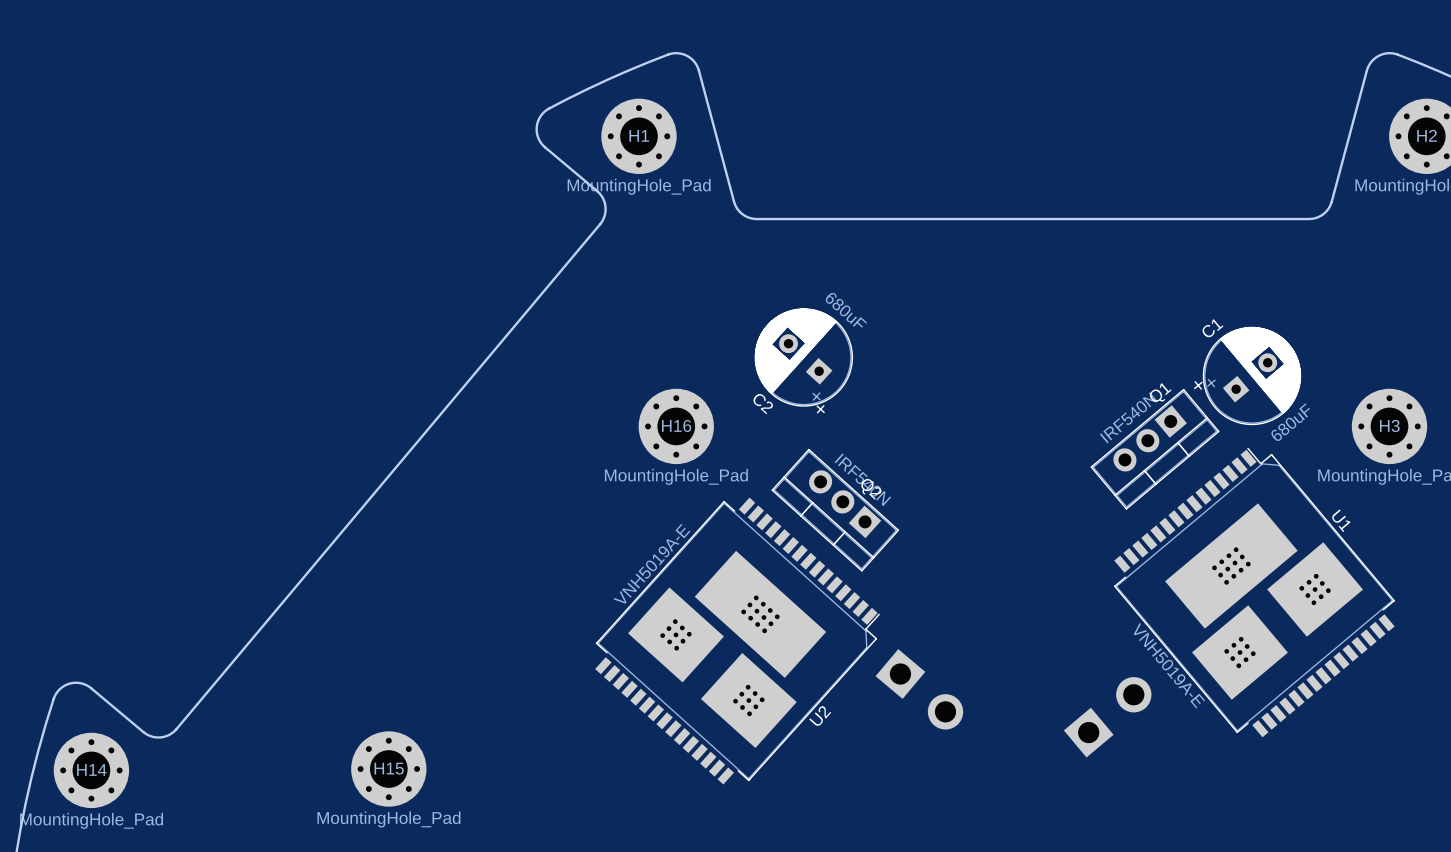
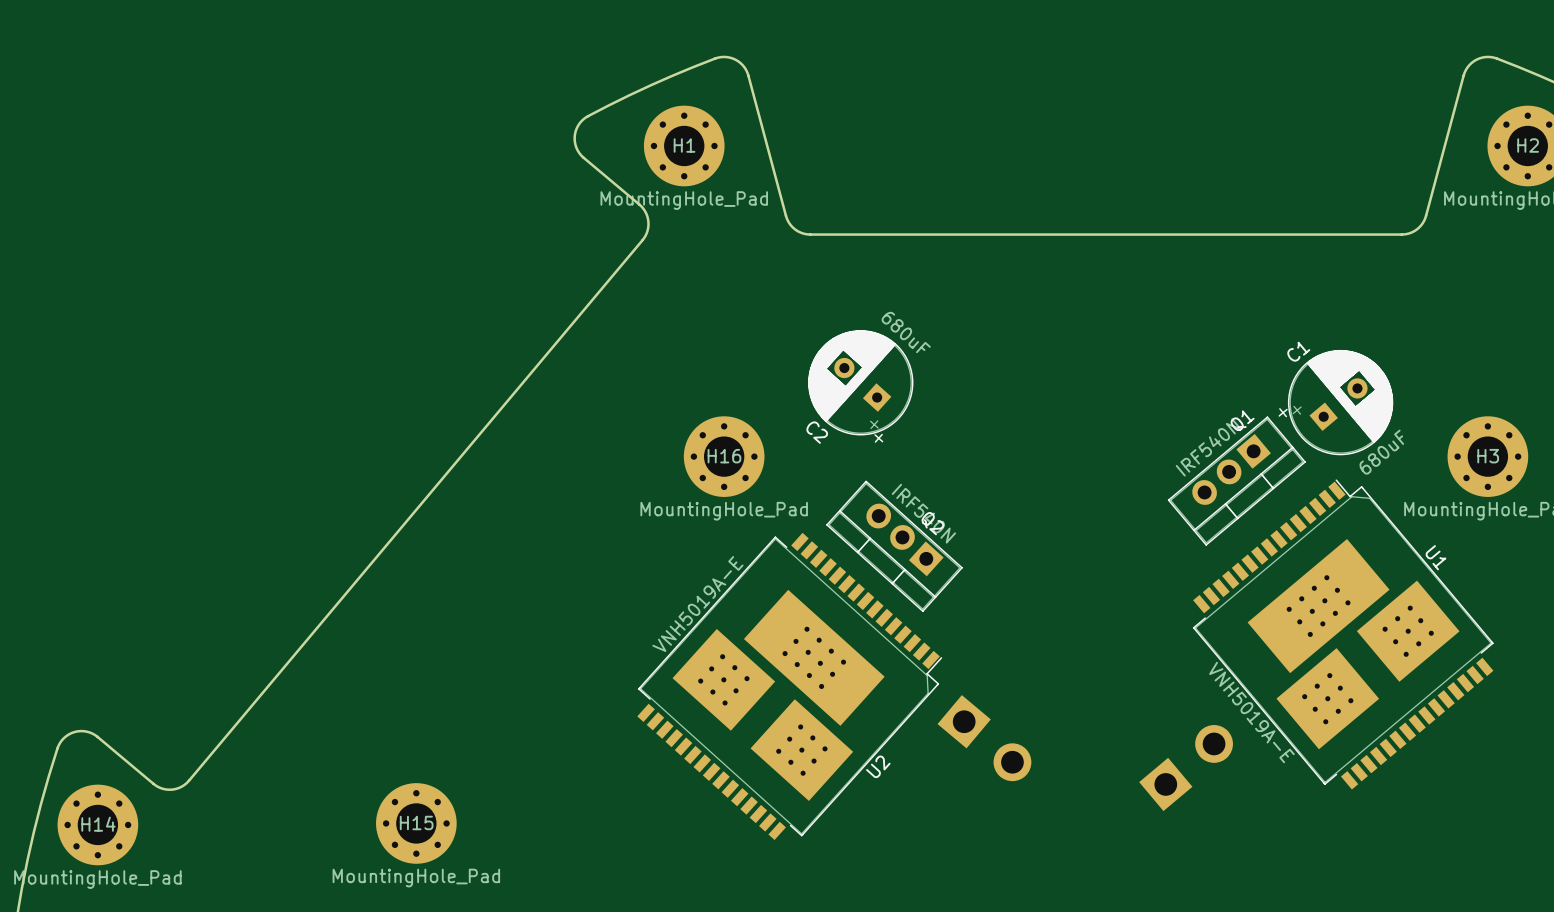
U1 footprint: [1114, 447, 1395, 738] -> [1192, 479, 1494, 790]
U2 footprint: [595, 497, 880, 785] -> [637, 532, 943, 841]

